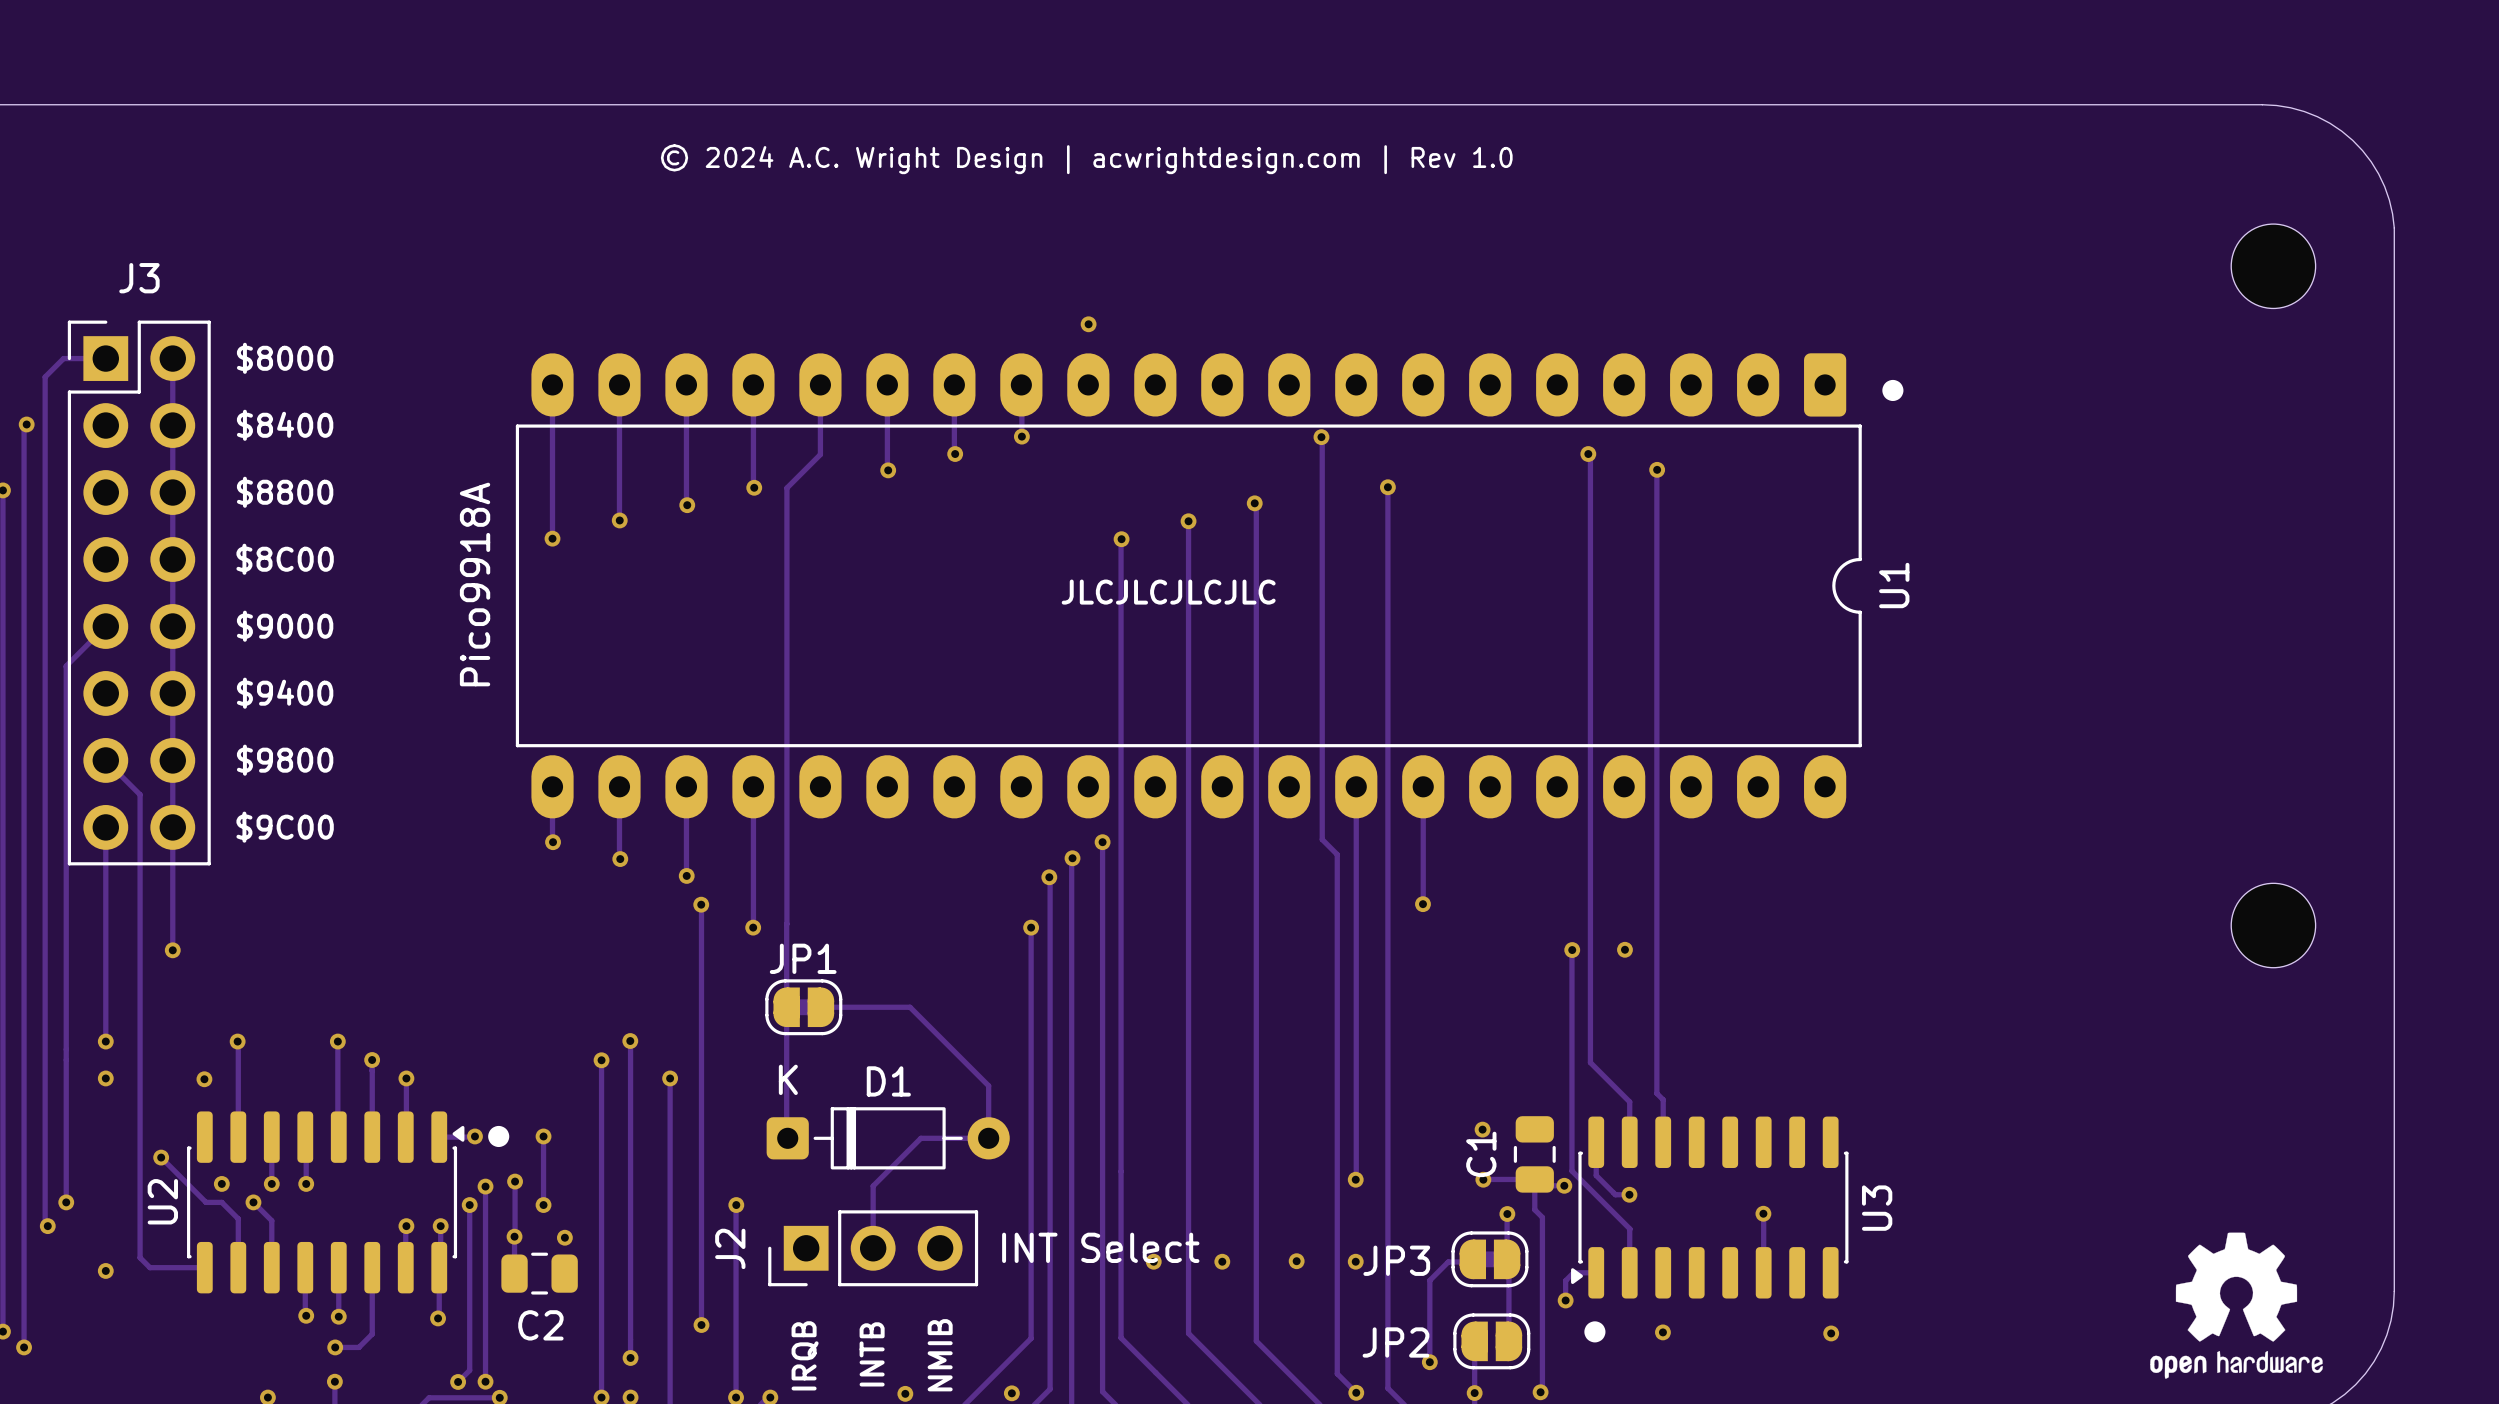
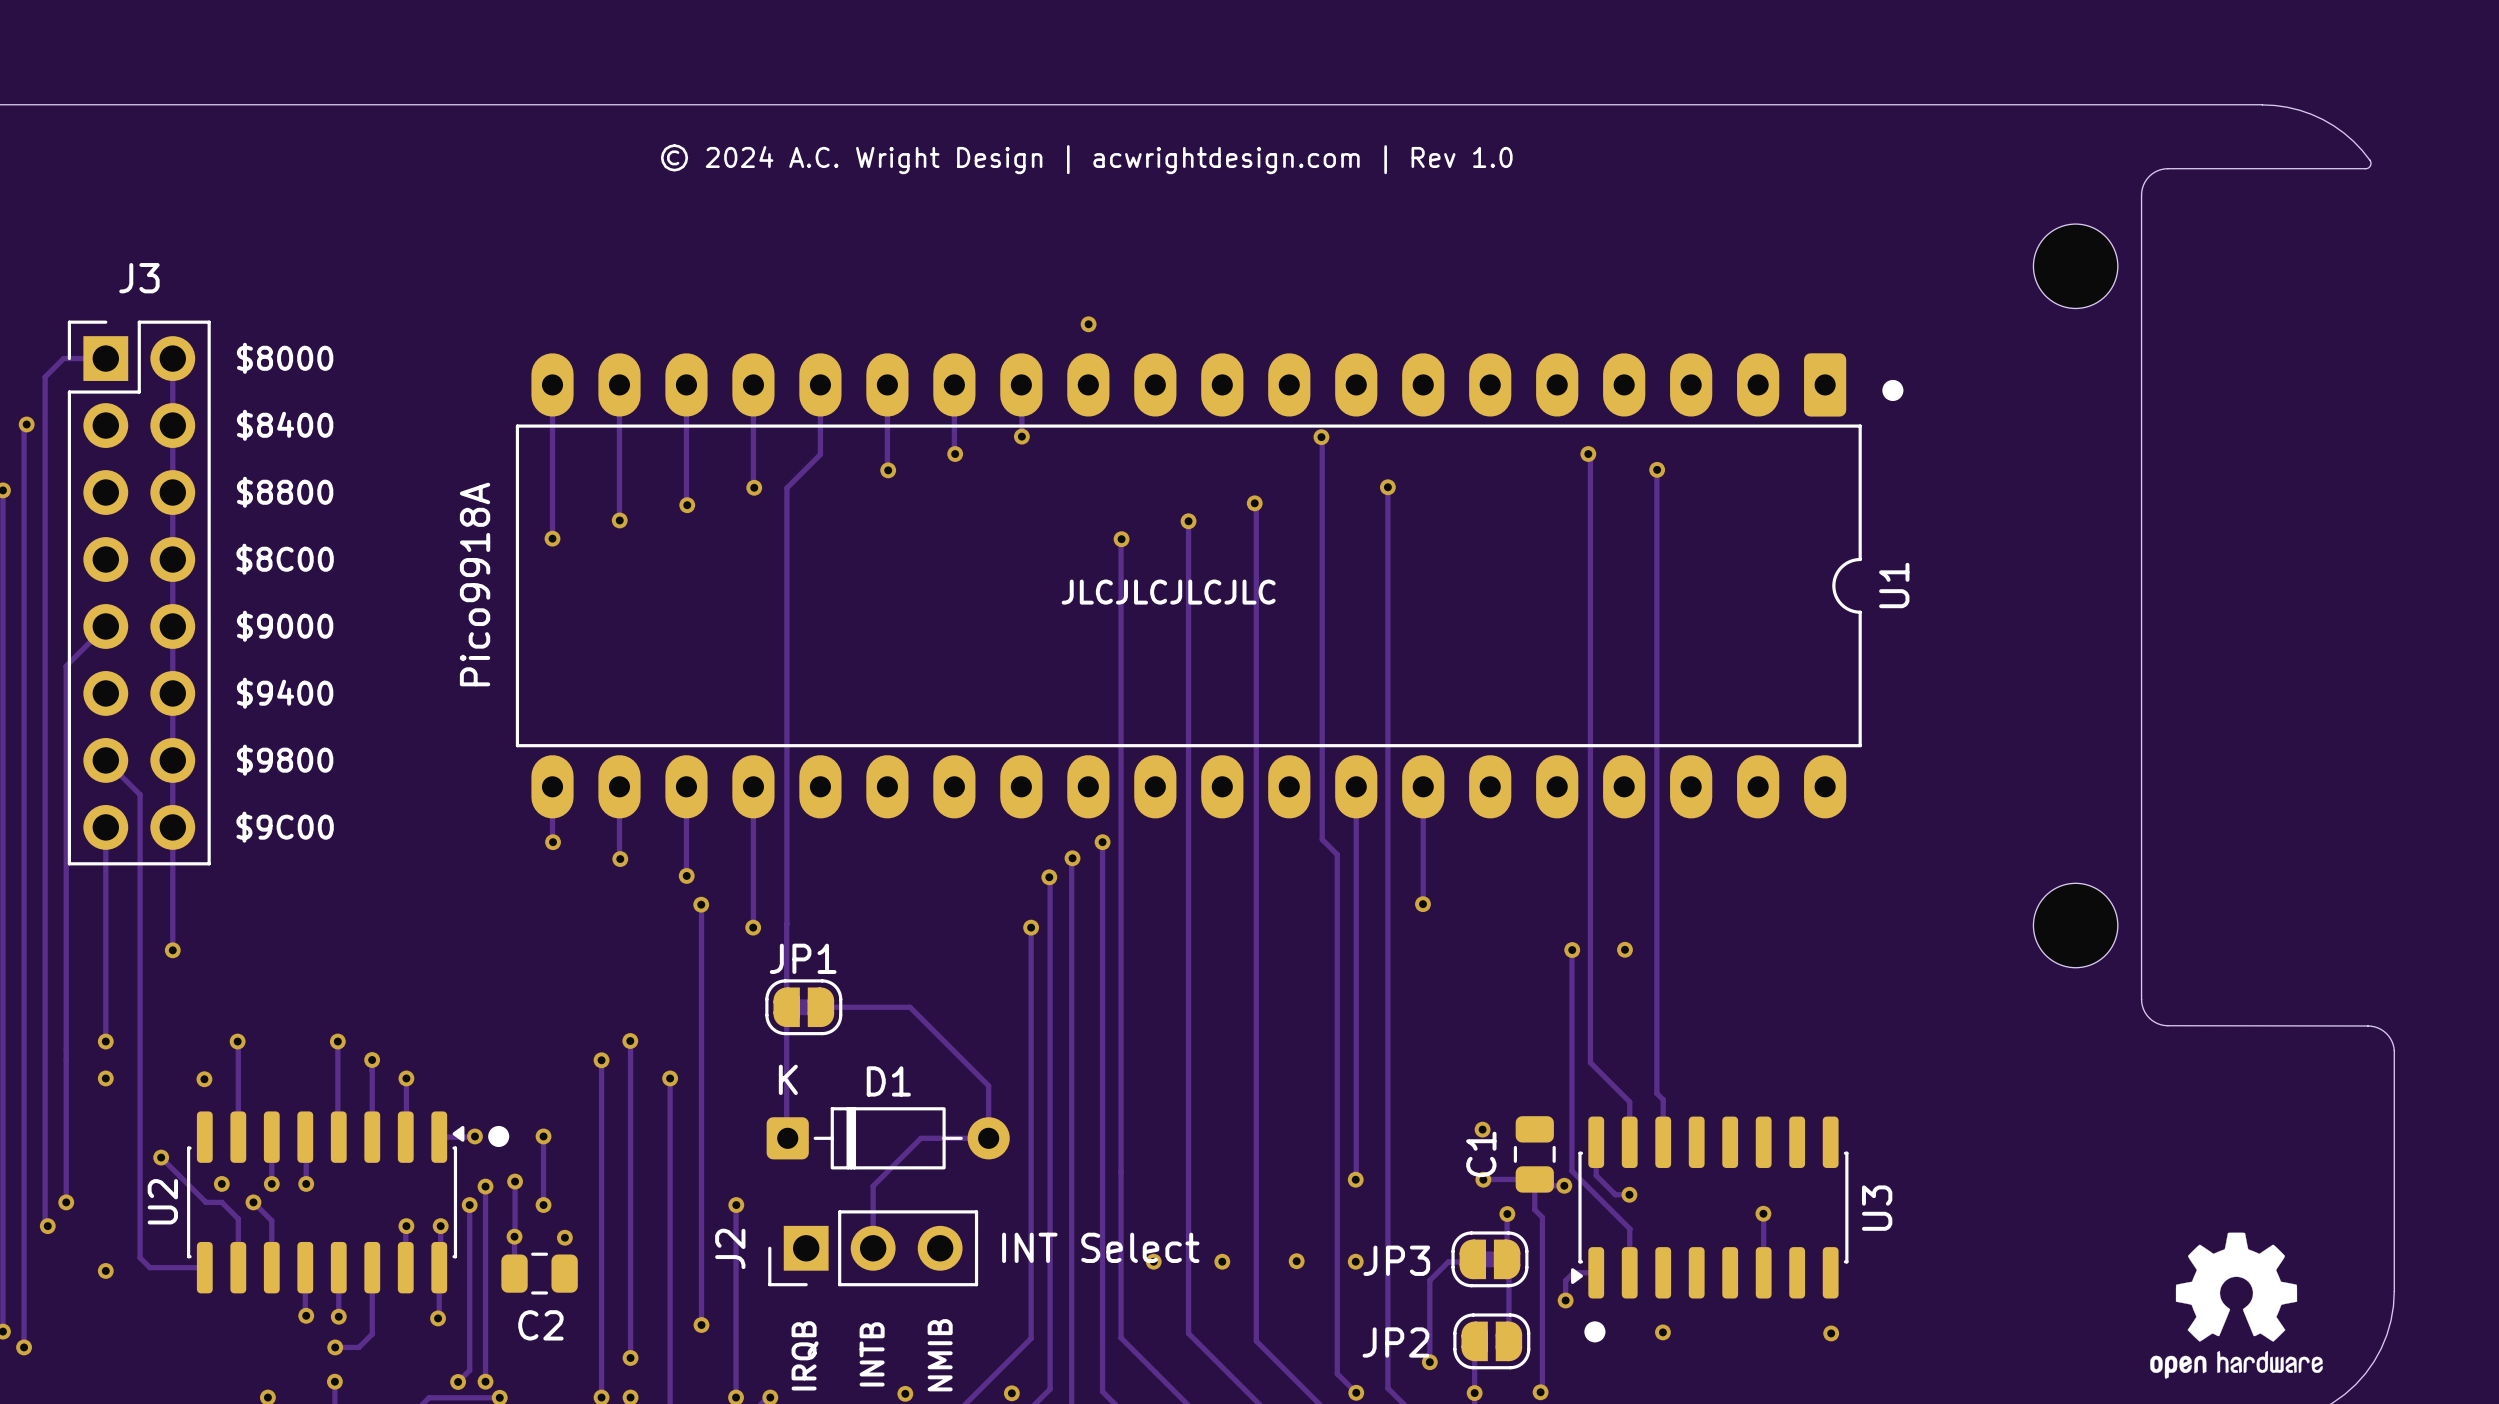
board edge: (2262, 104) (2290, 107) (2317, 116) (2330, 123) (2352, 140) (2362, 150) (2378, 173) (2389, 200) (2392, 213) (2394, 228) (2394, 1050) -> (2262, 104) (2287, 107) (2322, 119) (2353, 141) (2370, 163) (2366, 168) (2164, 168) (2149, 176) (2142, 188) (2141, 1002) (2149, 1017) (2164, 1025) (2371, 1026) (2386, 1033) (2391, 1041) (2394, 1050)
part position: (2273, 266) -> (2075, 266)
part position: (2273, 925) -> (2075, 925)

